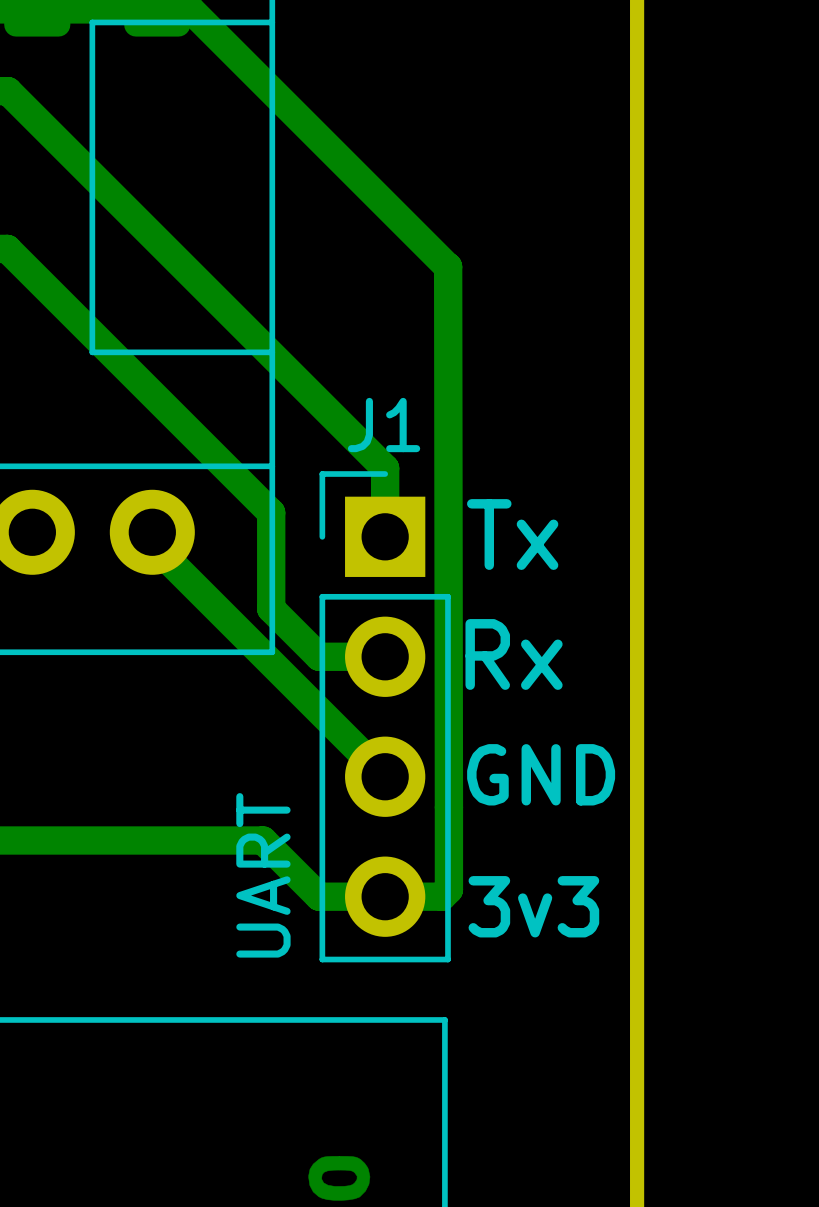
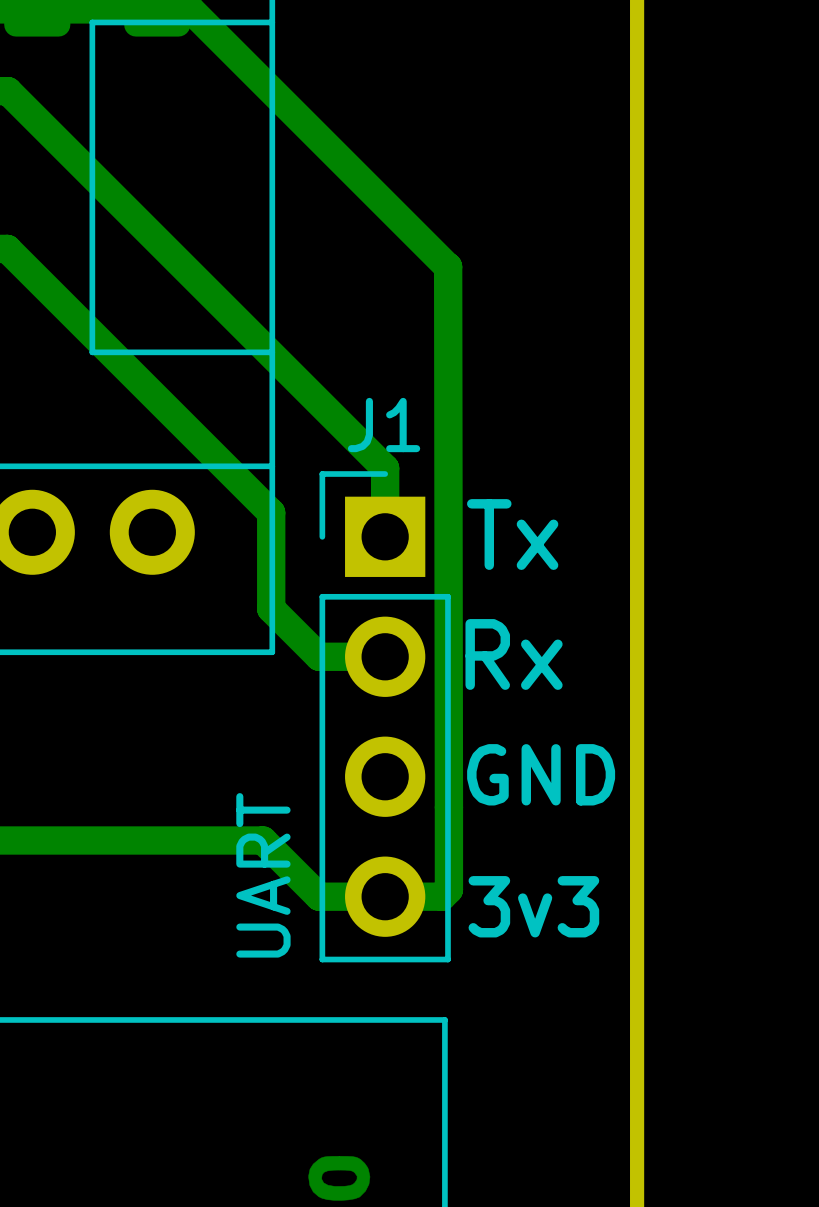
bottom track: (140, 532) (385, 776) -> none

